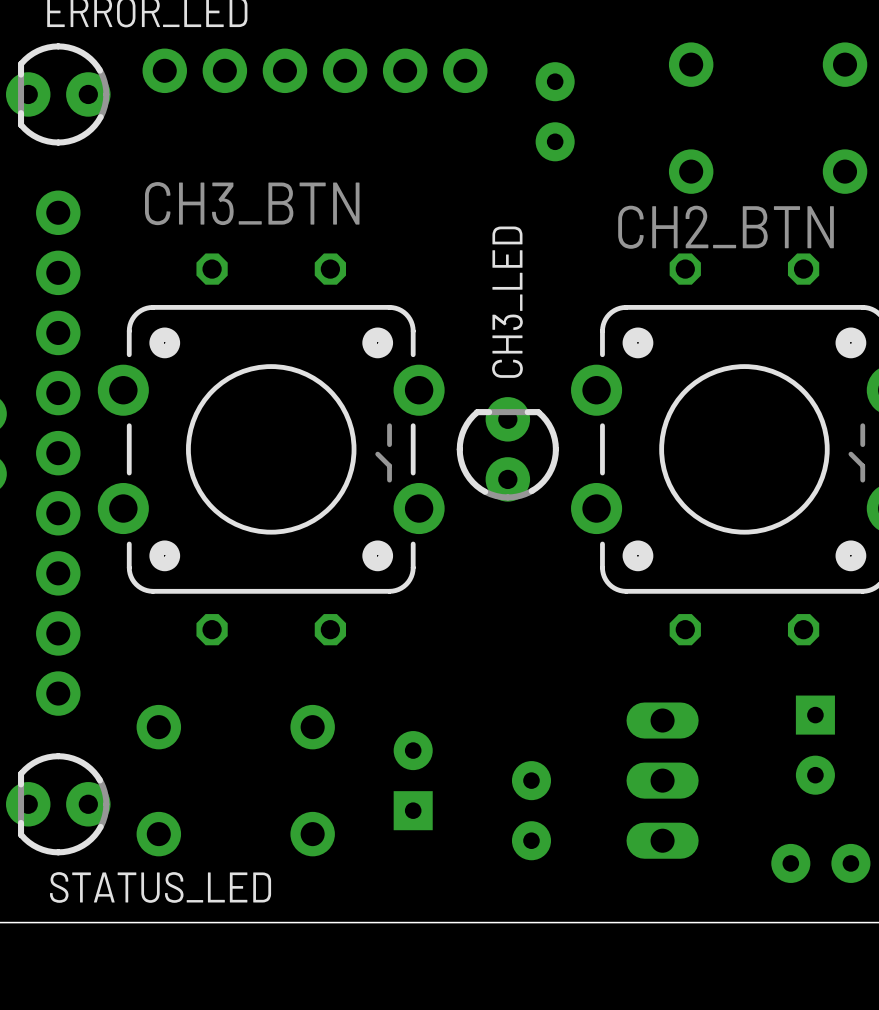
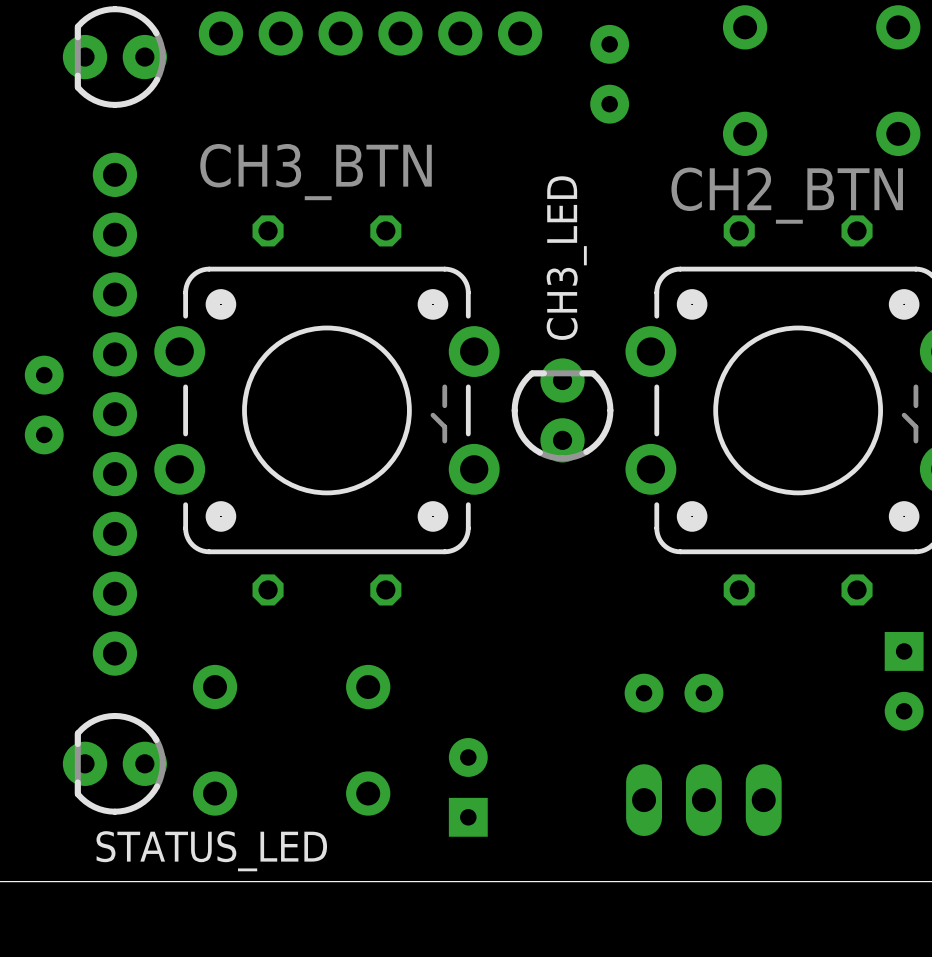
part position: (815, 745) -> (904, 681)
part position: (413, 780) -> (468, 787)
part rotation: 0° (662, 780) -> 90° clockwise (703, 800)
part rotation: 0° (531, 810) -> 90° clockwise (673, 693)
part position: (531, 810) -> (673, 693)
part: (820, 863) -> none

